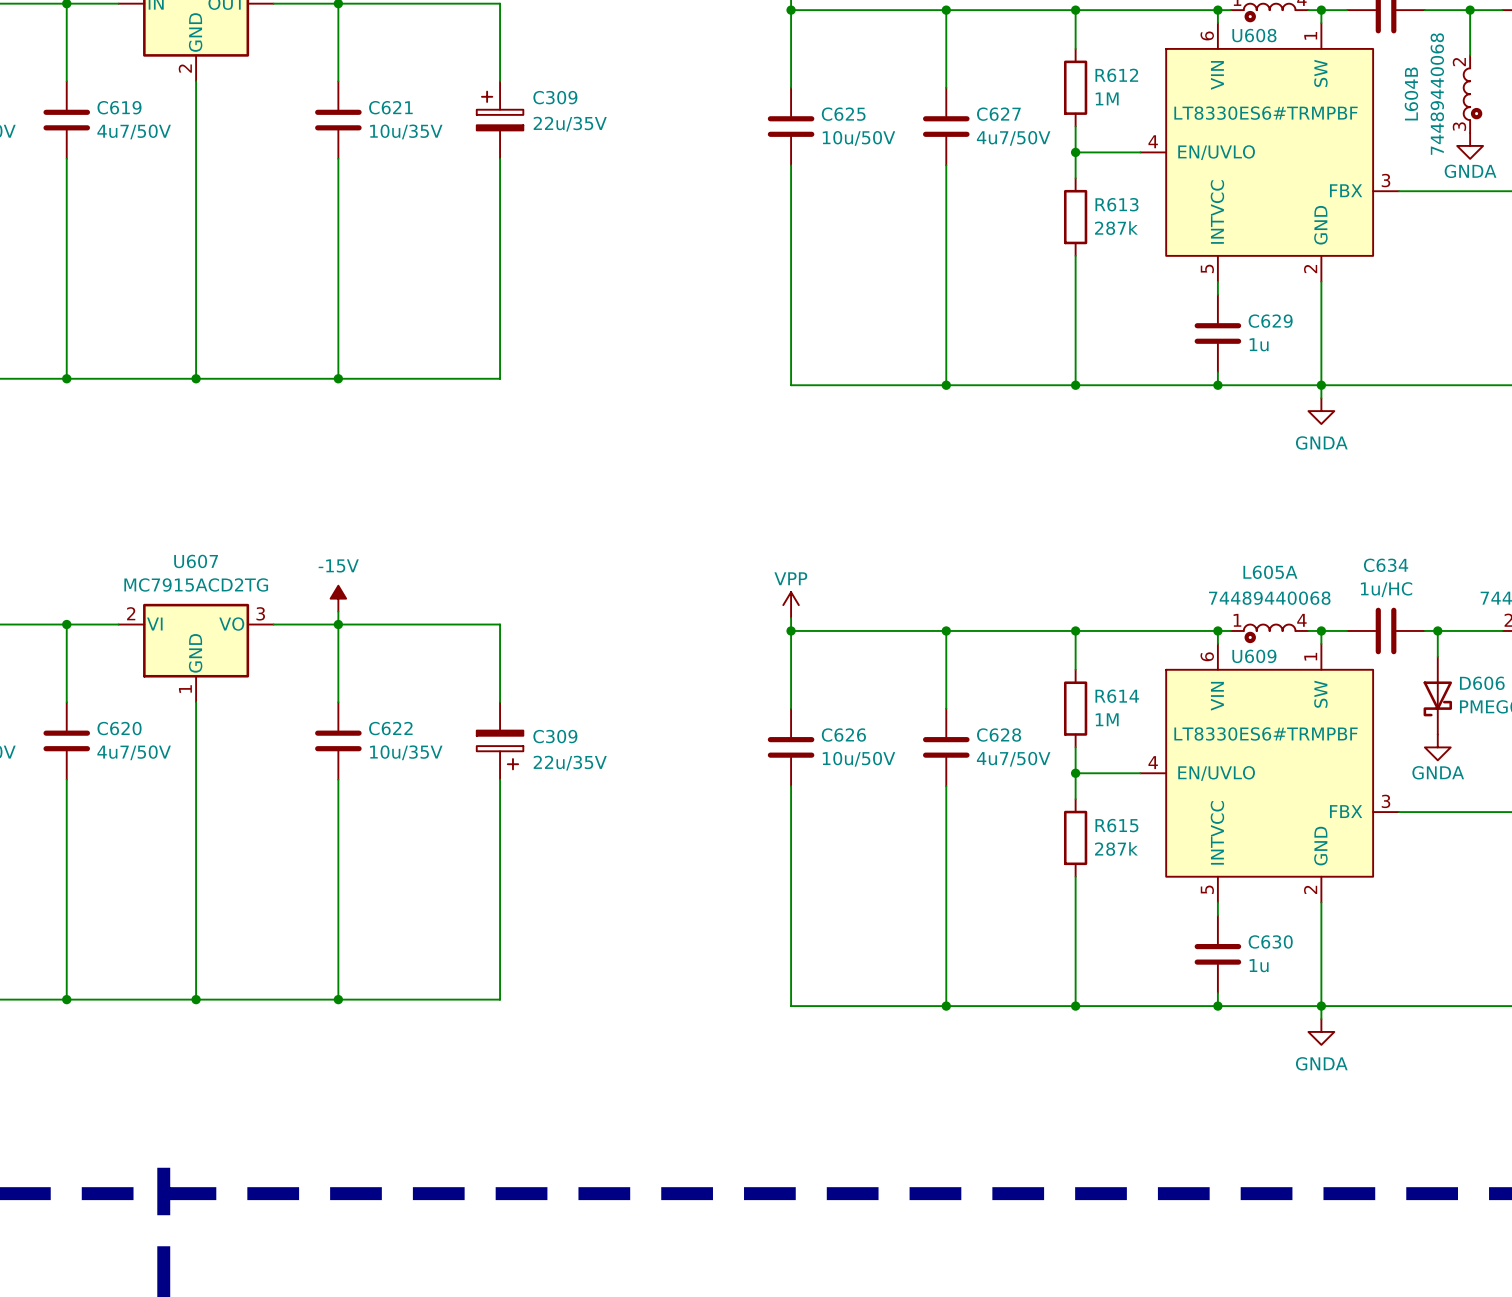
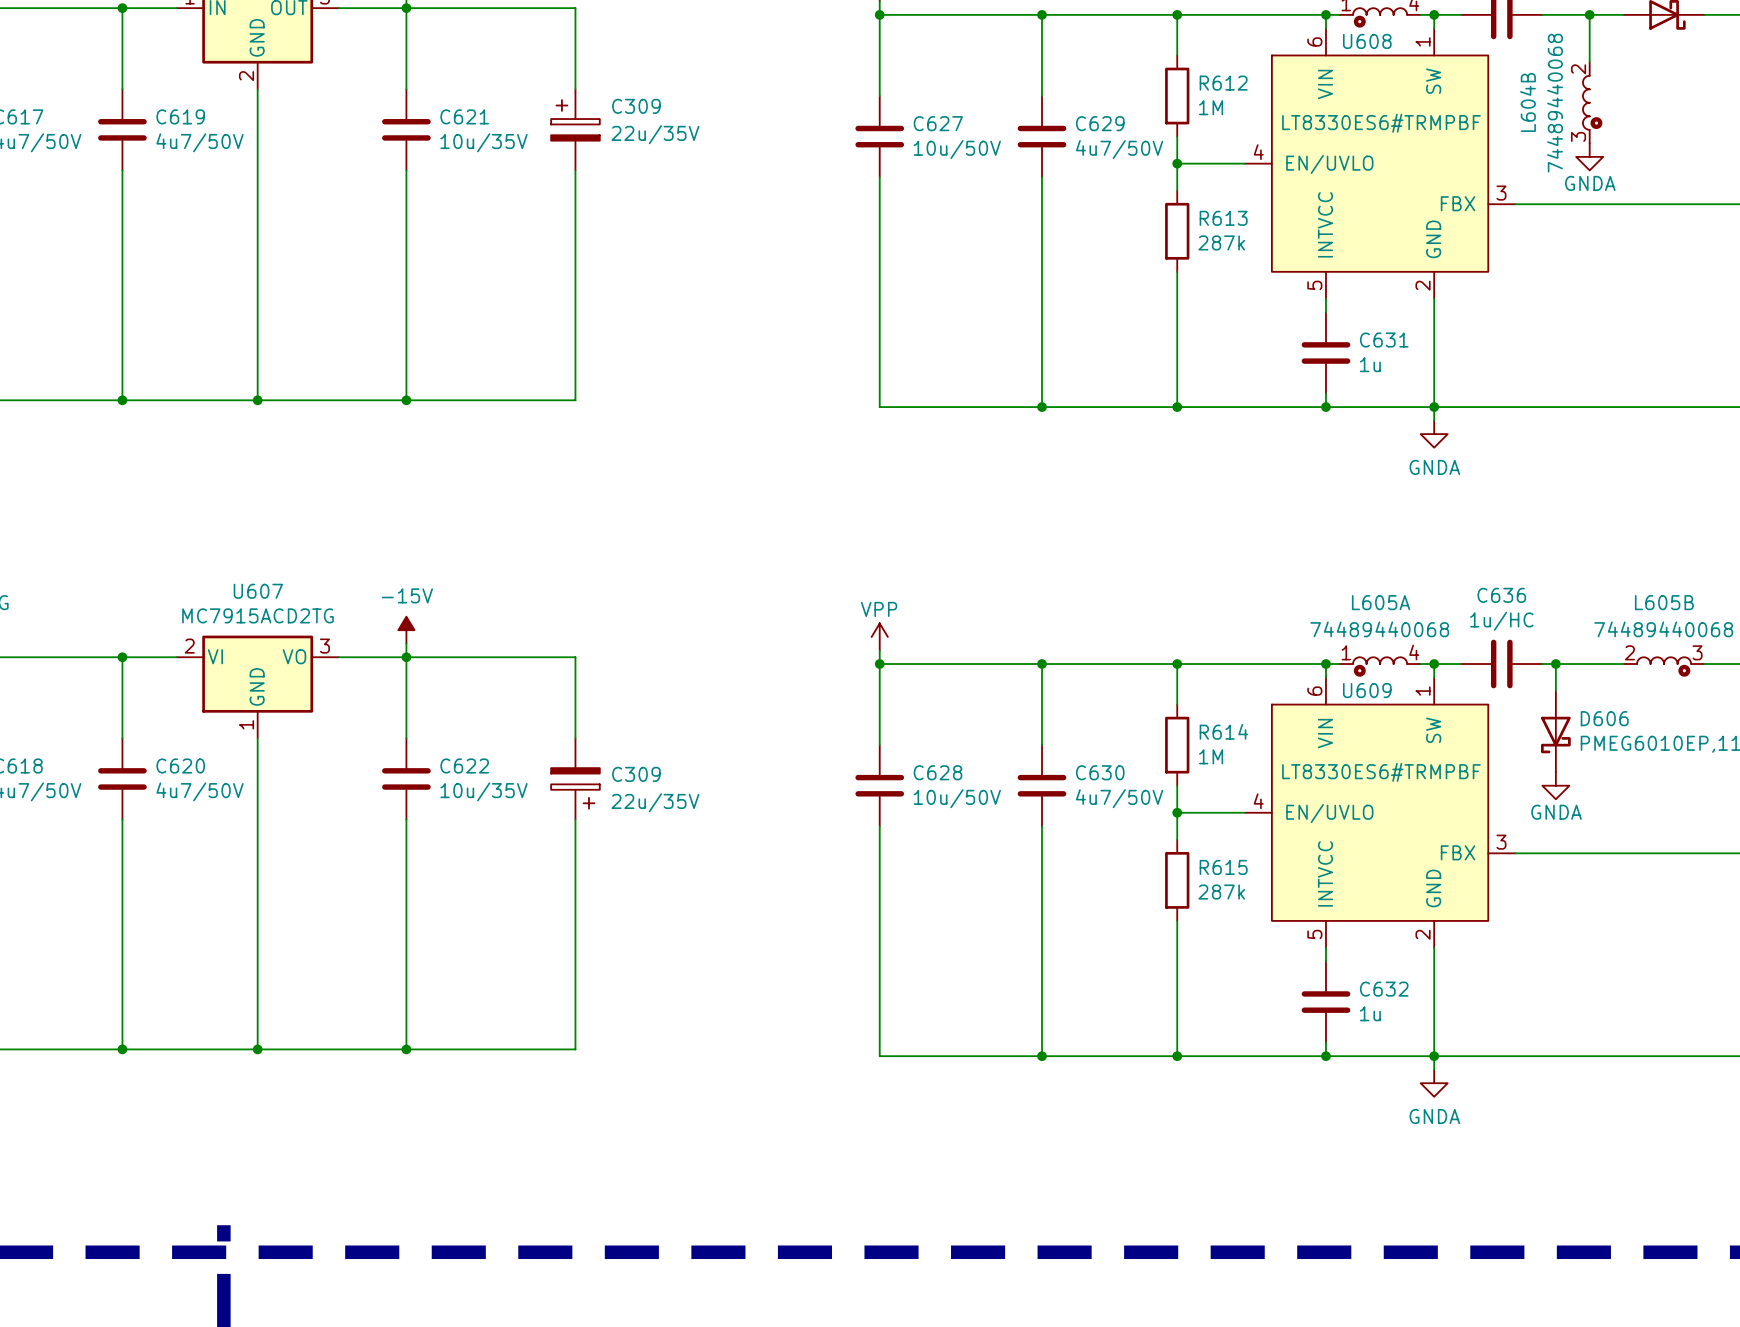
C625 name: C625 (843, 114) -> C627 (938, 123)
C627 name: C627 (998, 114) -> C629 (1100, 123)
C629 name: C629 (1270, 321) -> C631 (1384, 340)
C634 name: C634 (1386, 565) -> C636 (1501, 595)
C626 name: C626 (843, 735) -> C628 (937, 772)
C628 name: C628 (999, 735) -> C630 (1100, 772)
C630 name: C630 (1270, 941) -> C632 (1384, 989)

